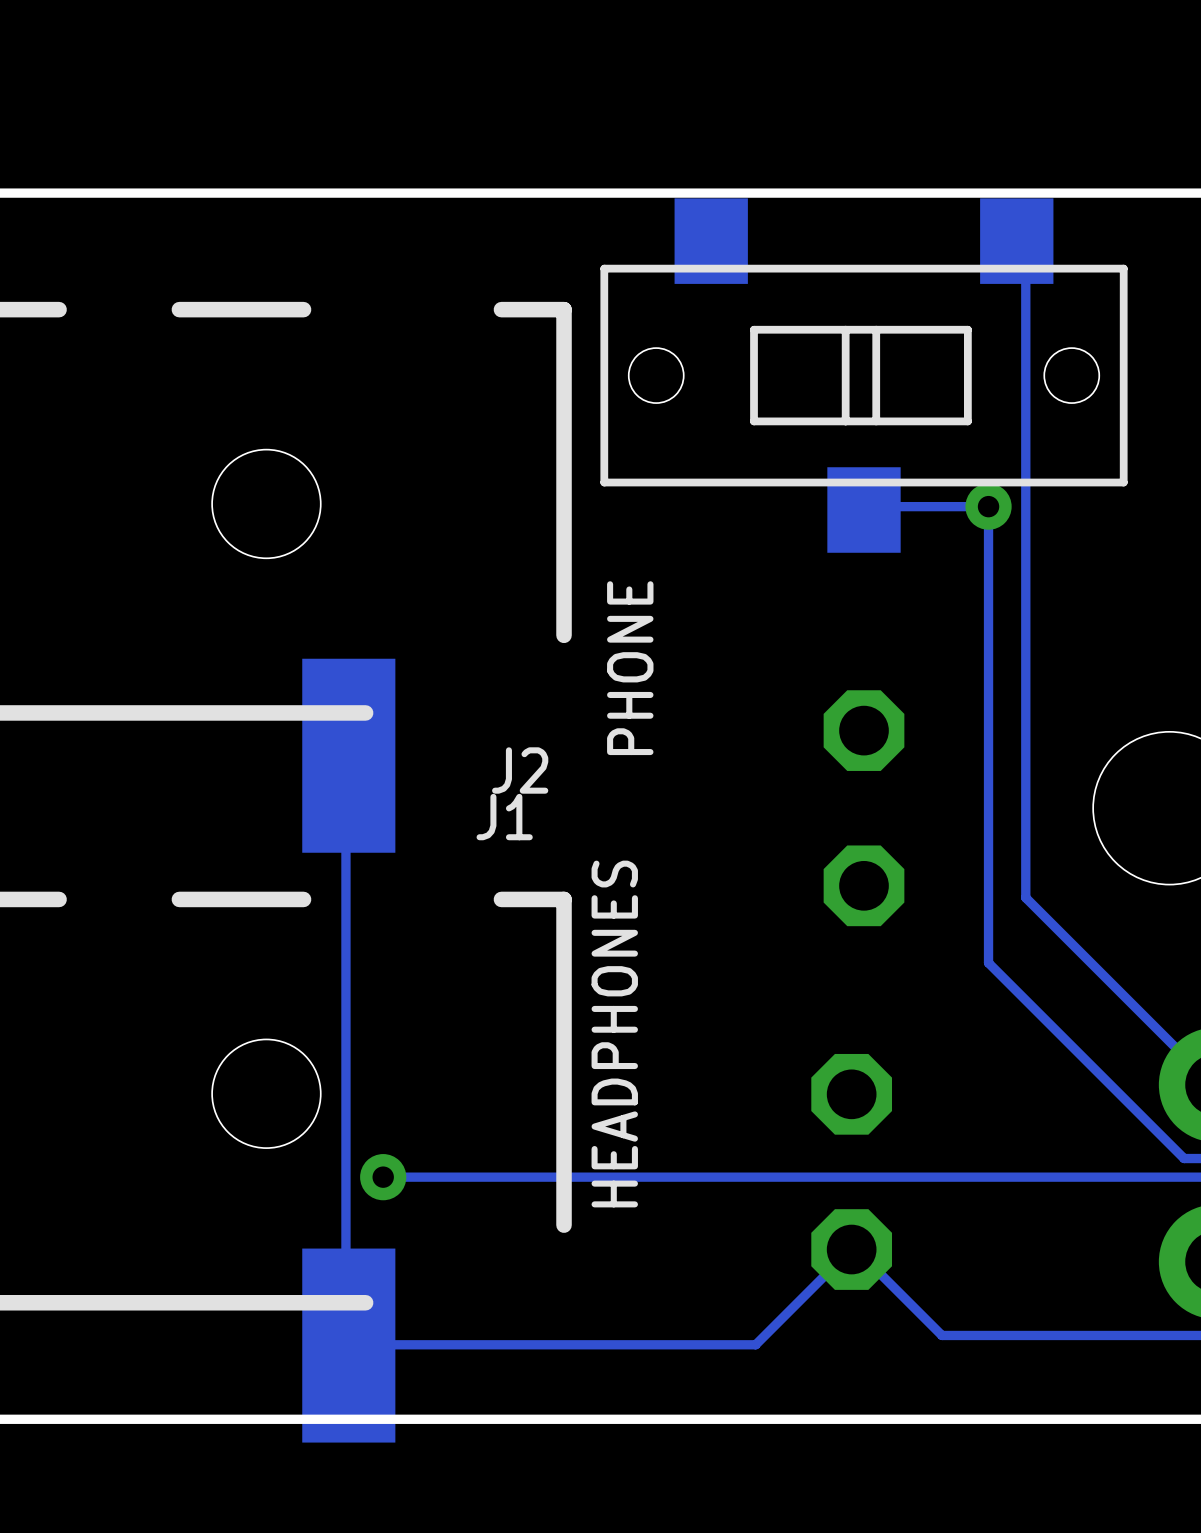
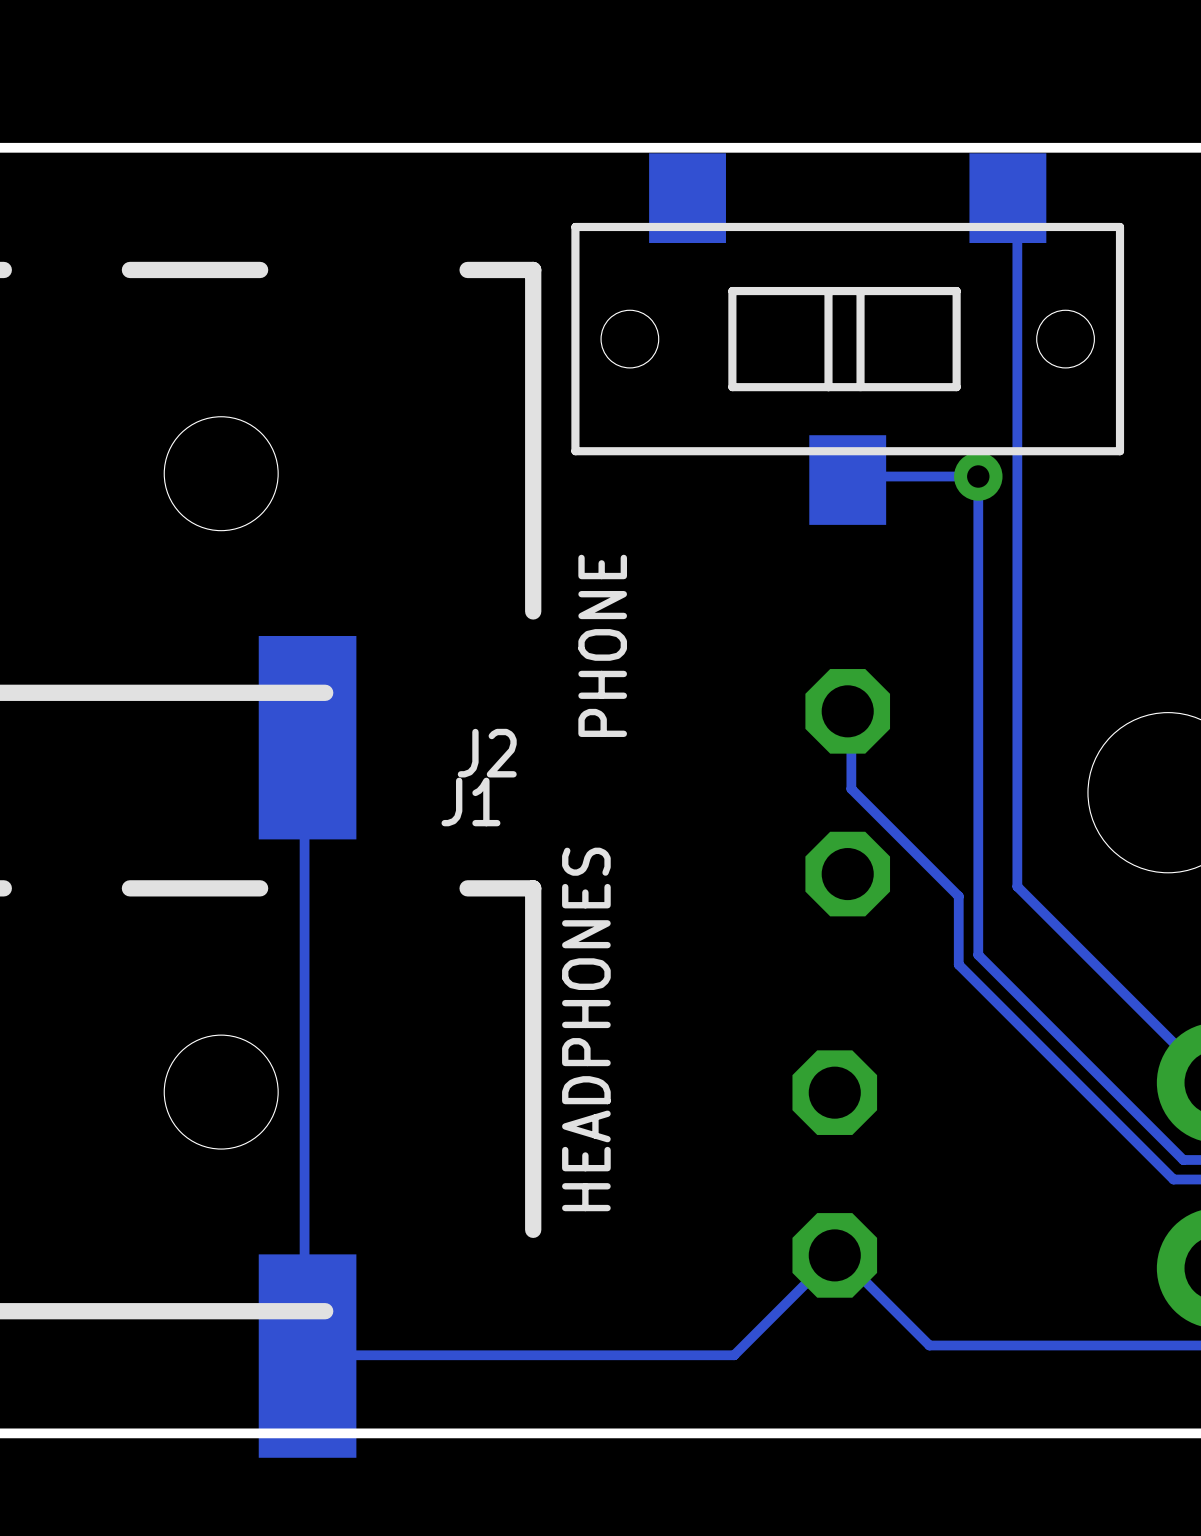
via: (383, 1177) -> none
track: (1174, 1177) (383, 1177) -> (1173, 1179) (958, 964) (958, 896) (851, 788) (851, 720) (847, 711)

